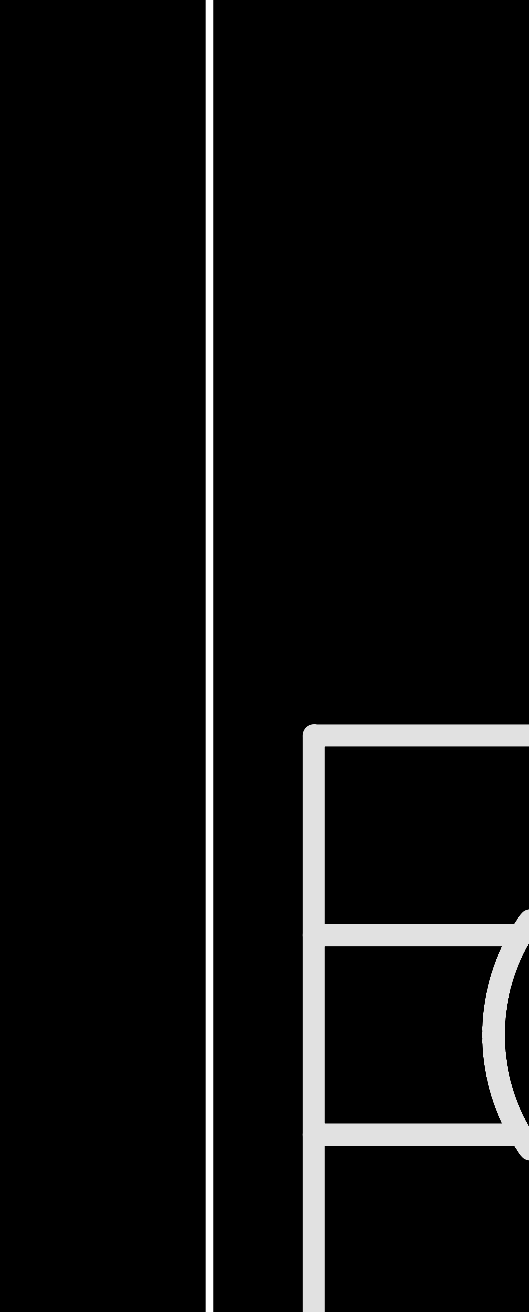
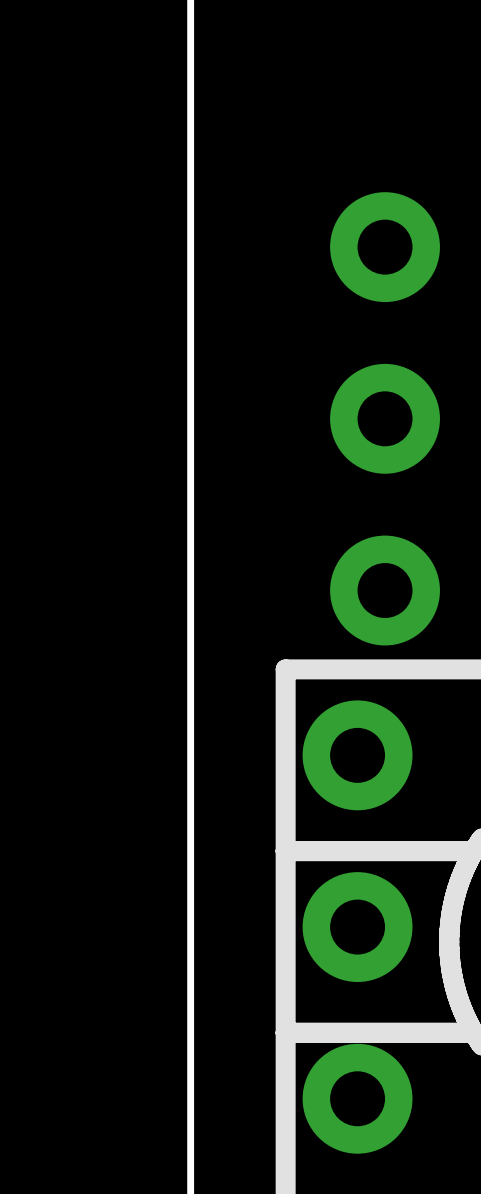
part: none -> (385, 418)
part: none -> (357, 927)

